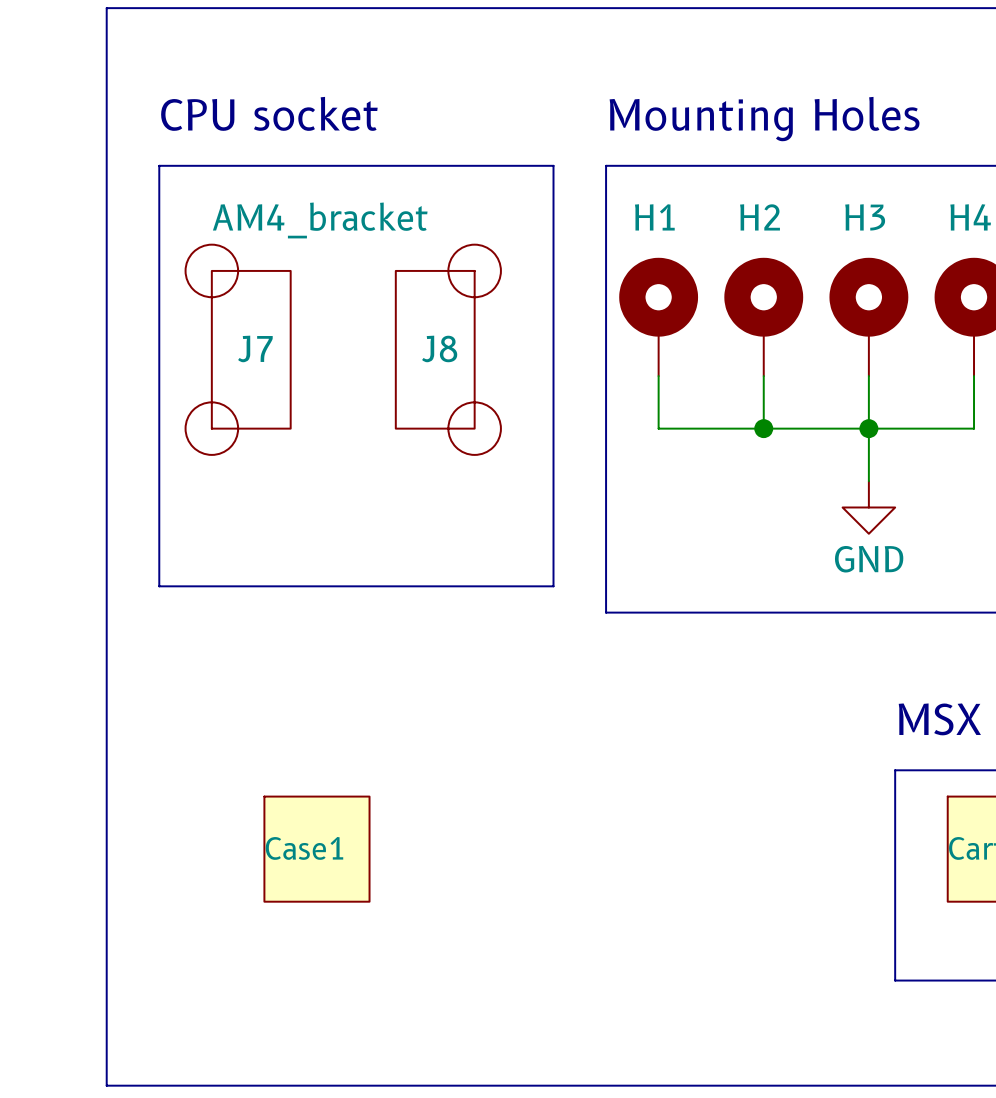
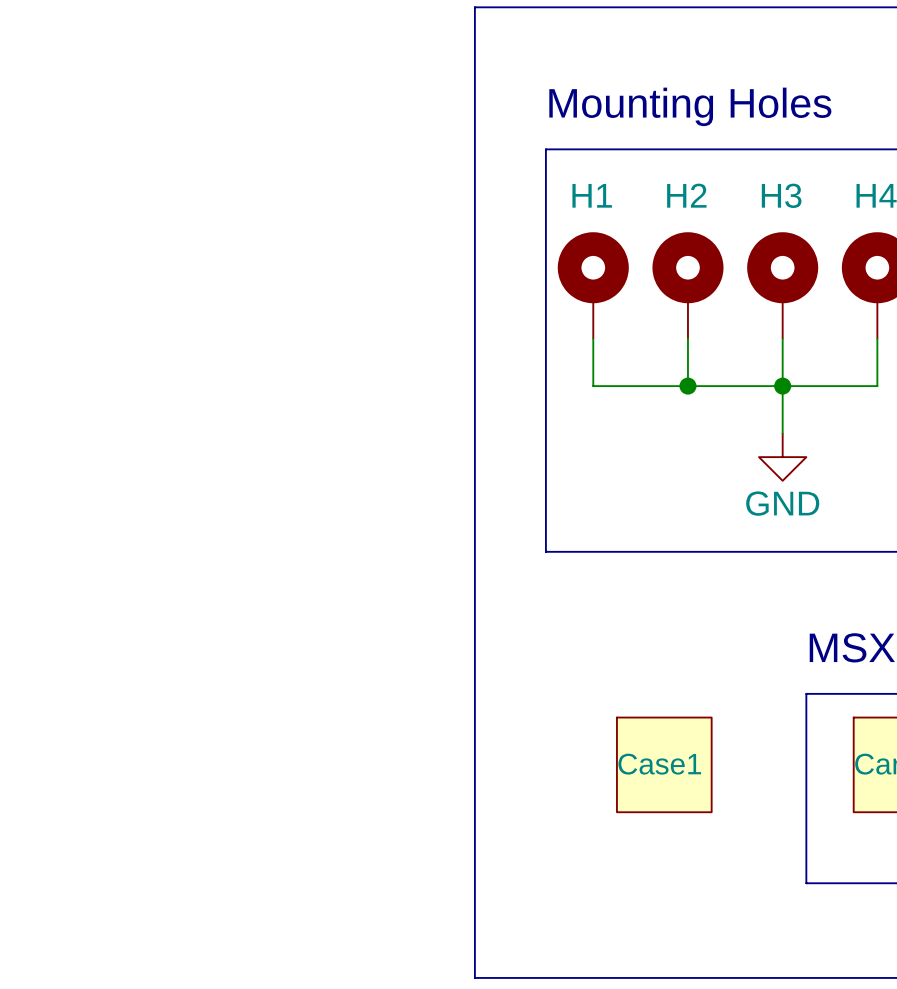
line: (527, 8) (106, 8) (106, 1085) (527, 1085) -> (474, 7) (474, 977)
text: CPU socket (269, 113) -> none
line: (159, 165) (159, 586) (553, 586) (553, 165) (159, 165) -> none
J7: (238, 349) -> none
J8: AM4_bracket (448, 349) -> none
Case1 position: (316, 849) -> (664, 764)

